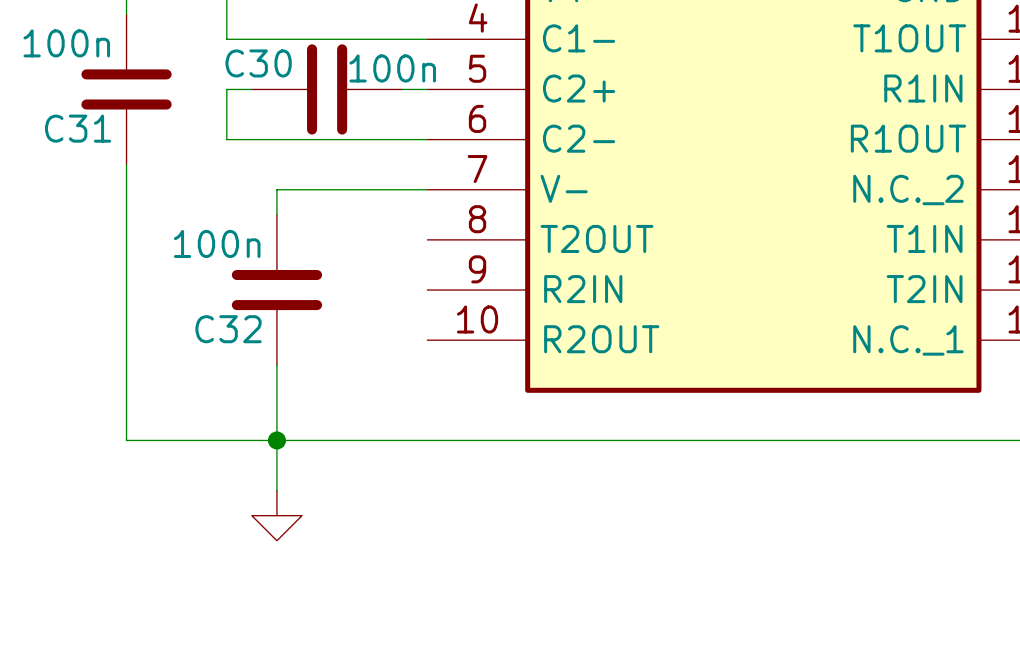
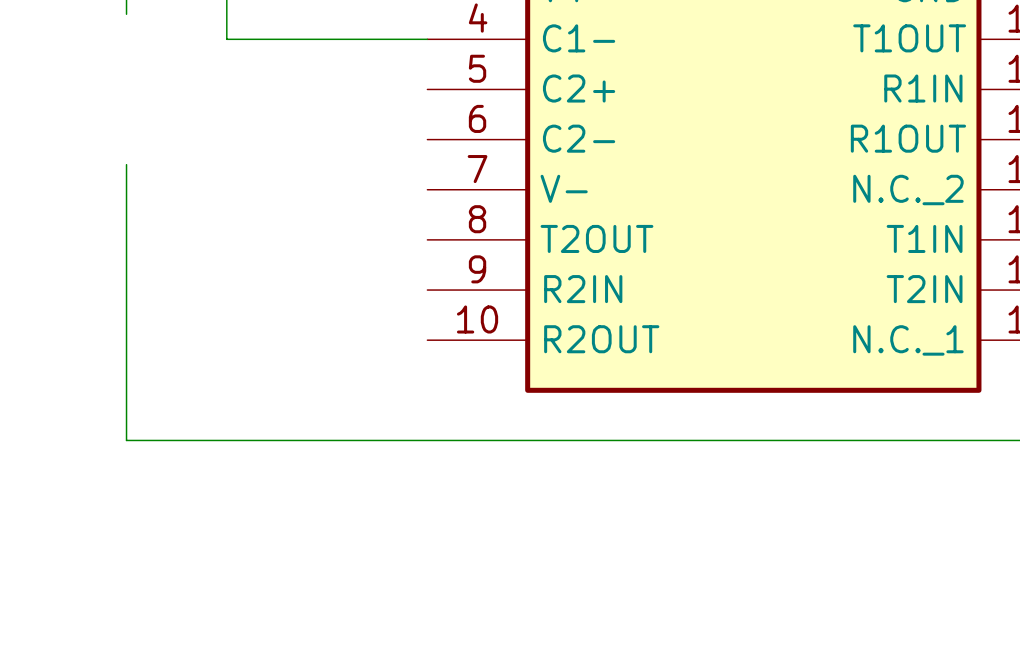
C31: 100n (126, 89) -> none
wire: (251, 89) (226, 89) (226, 139) (427, 139) -> none
C30: 100n (327, 89) -> none
wire: (402, 89) (427, 89) -> none
wire: (427, 189) (276, 189) (276, 214) -> none
C32: 100n (276, 290) -> none
wire: (276, 365) (276, 490) -> none
junction: (276, 440) -> none
power symbol: (276, 515) -> none

